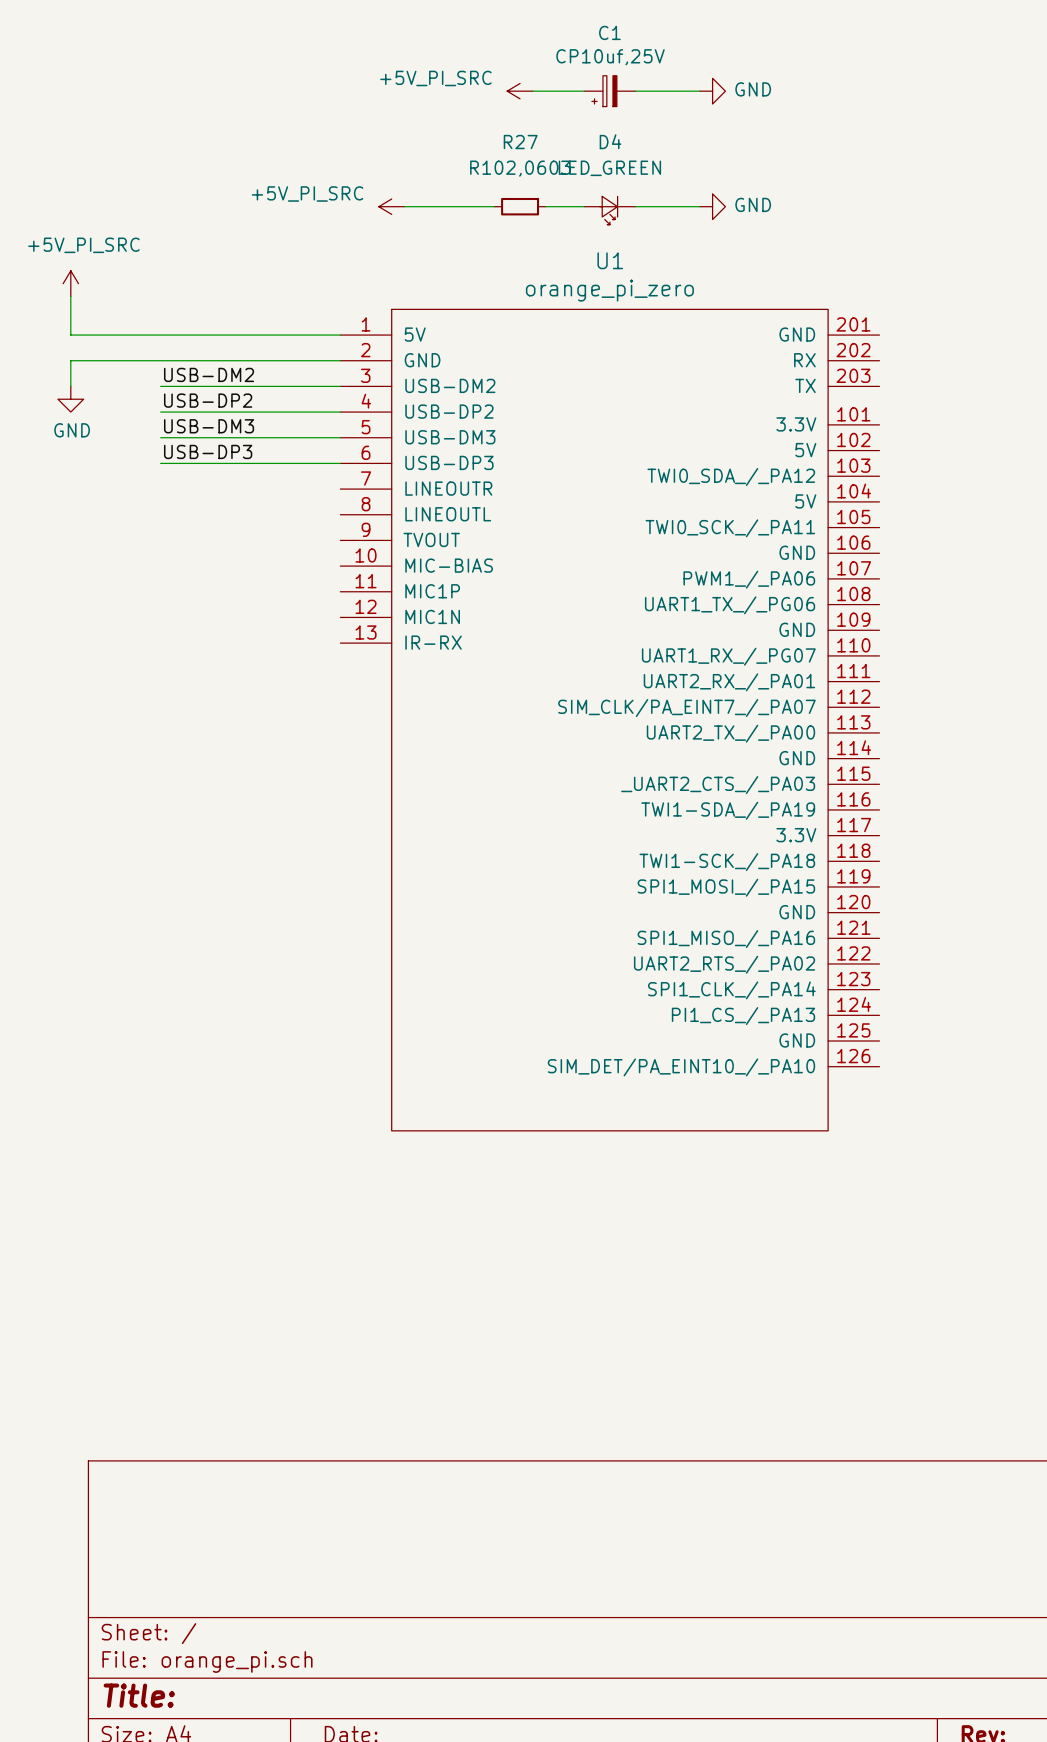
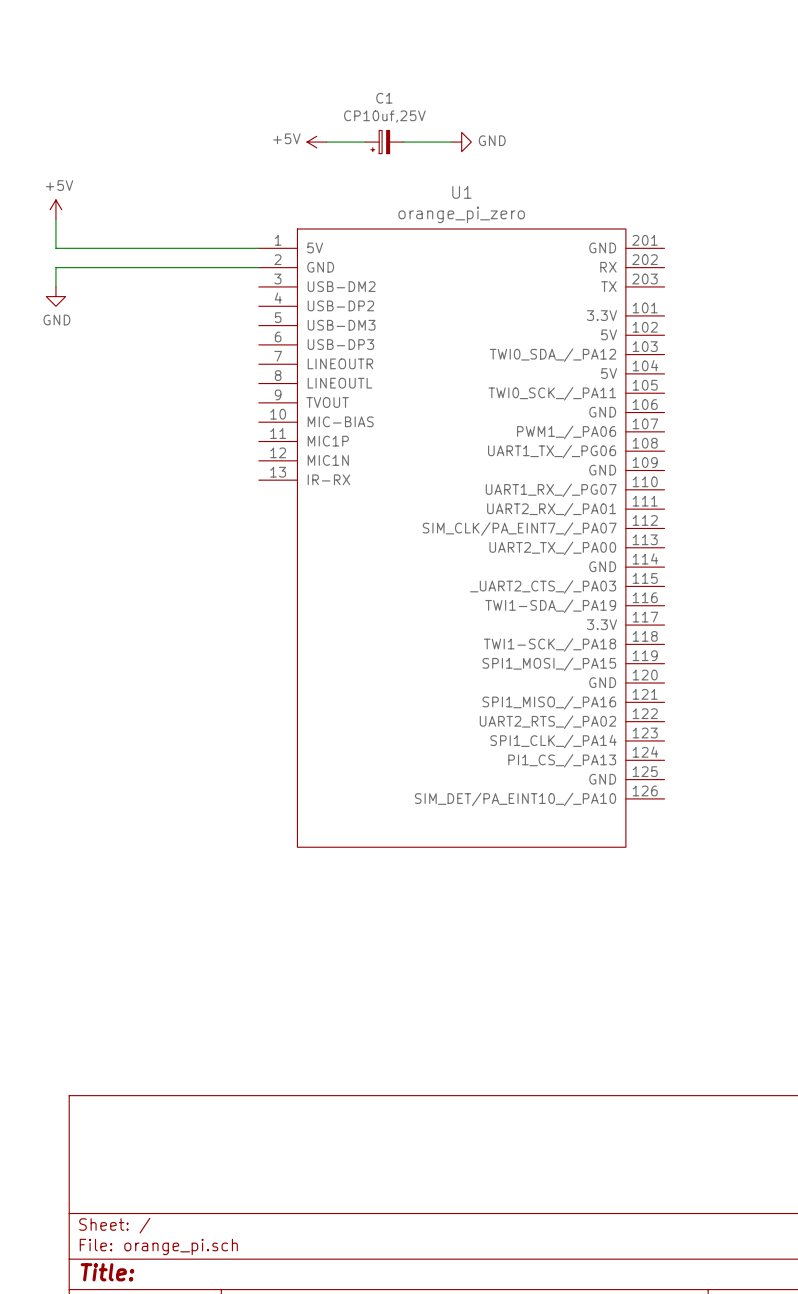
power symbol: +5V_PI_SRC (520, 91) -> none
wire: (532, 91) (584, 91) -> (326, 142) (365, 142)
C1 position: (609, 91) -> (384, 142)
wire: (635, 91) (699, 91) -> (403, 142) (452, 142)
power symbol: GND (712, 91) -> none
power symbol: none -> +5V (316, 142)
power symbol: none -> GND (461, 142)
power symbol: +5V_PI_SRC (391, 206) -> none
wire: (404, 206) (494, 206) -> none
R27: R102,0603 (520, 206) -> none
wire: (545, 206) (584, 206) -> none
wire: (635, 206) (699, 206) -> none
power symbol: GND (712, 206) -> none
D4: LED_GREEN (609, 210) -> none
power symbol: +5V_PI_SRC (70, 283) -> +5V (55, 209)
label: USB-DM2 (209, 374) -> none
wire: (160, 386) (340, 386) -> none
label: USB-DP2 (208, 400) -> none
wire: (160, 412) (340, 412) -> none
label: USB-DM3 (209, 426) -> none
wire: (160, 437) (340, 437) -> none
label: USB-DP3 (208, 451) -> none
wire: (160, 463) (340, 463) -> none

